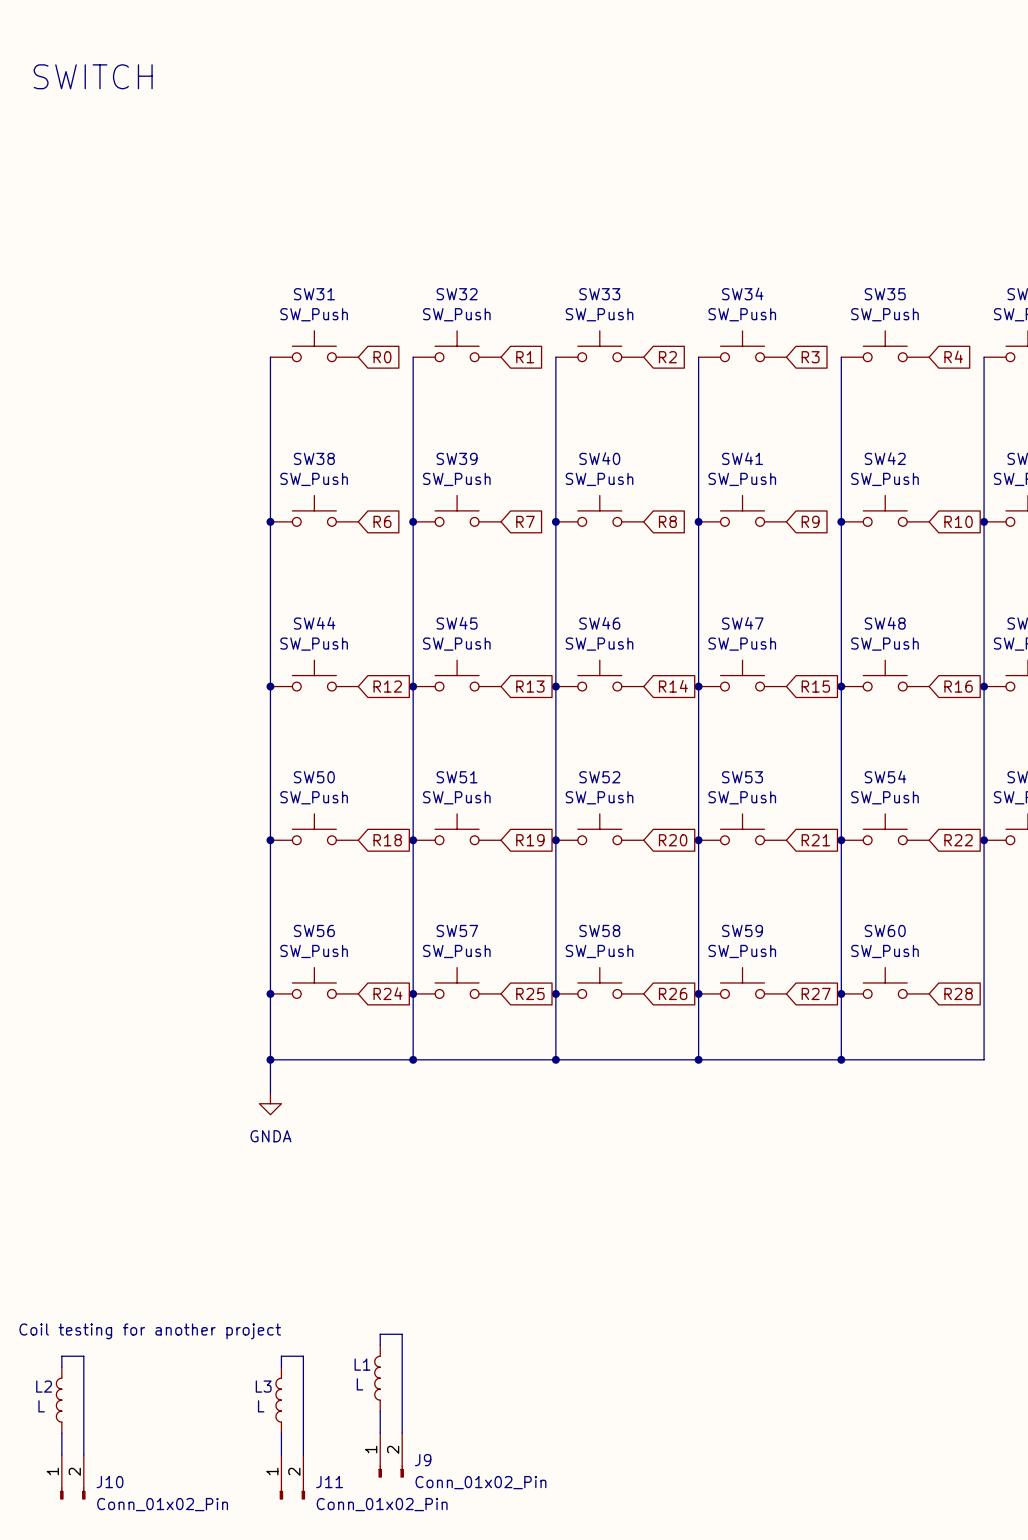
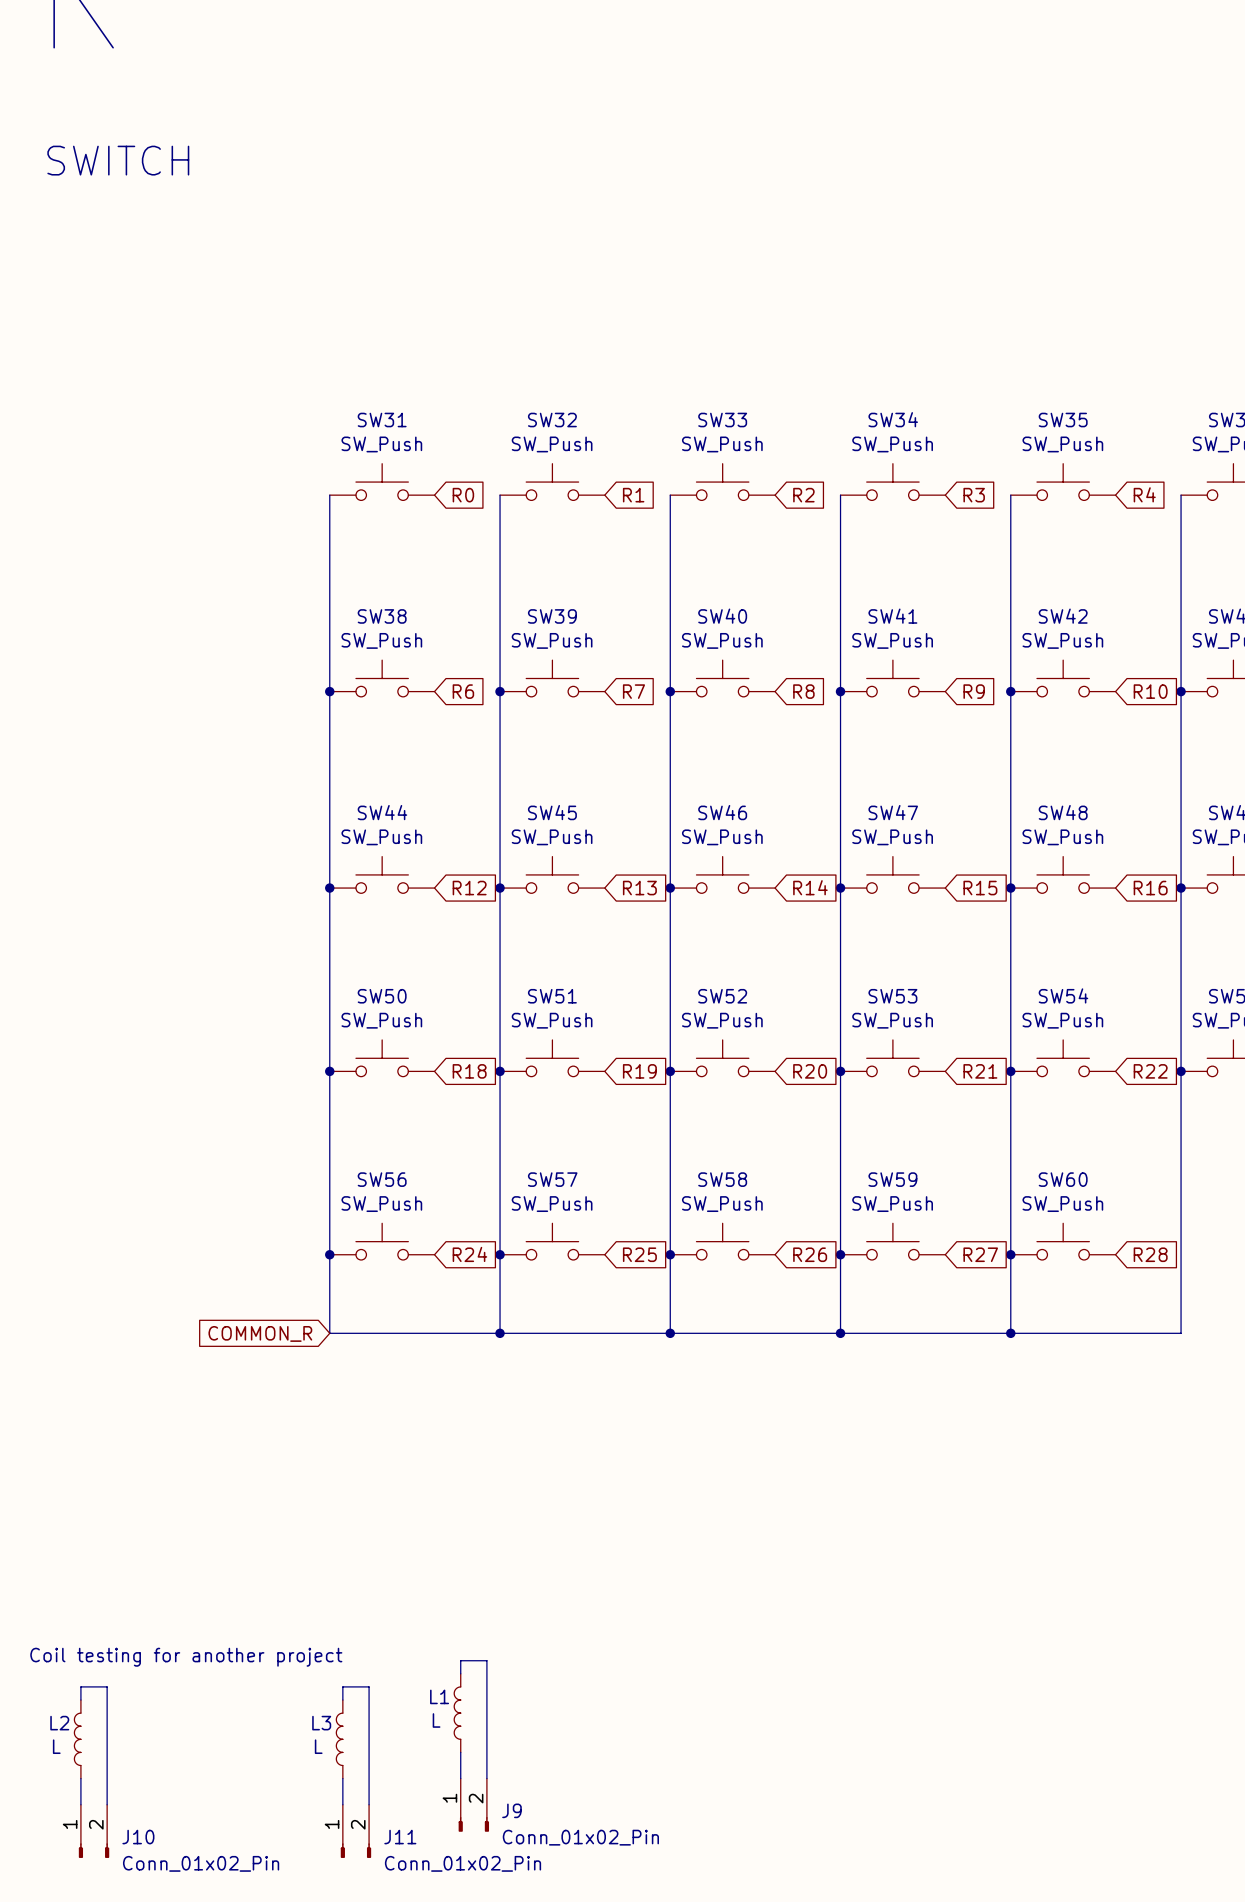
wire: (270, 1059) (270, 1092) -> none
junction: (270, 1059) -> none
global label: none -> COMMON_R (260, 1333)
power symbol: GNDA (270, 1103) -> none

